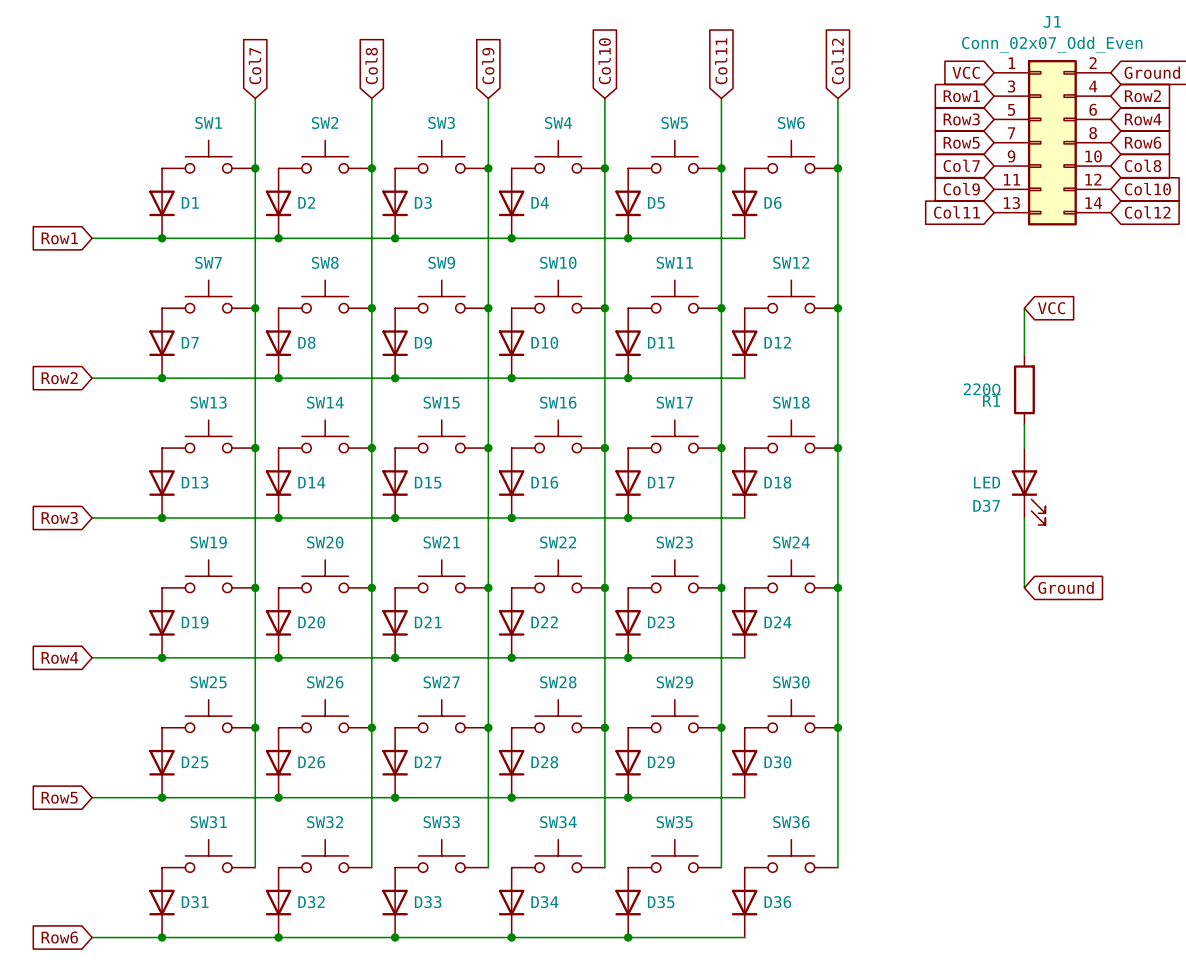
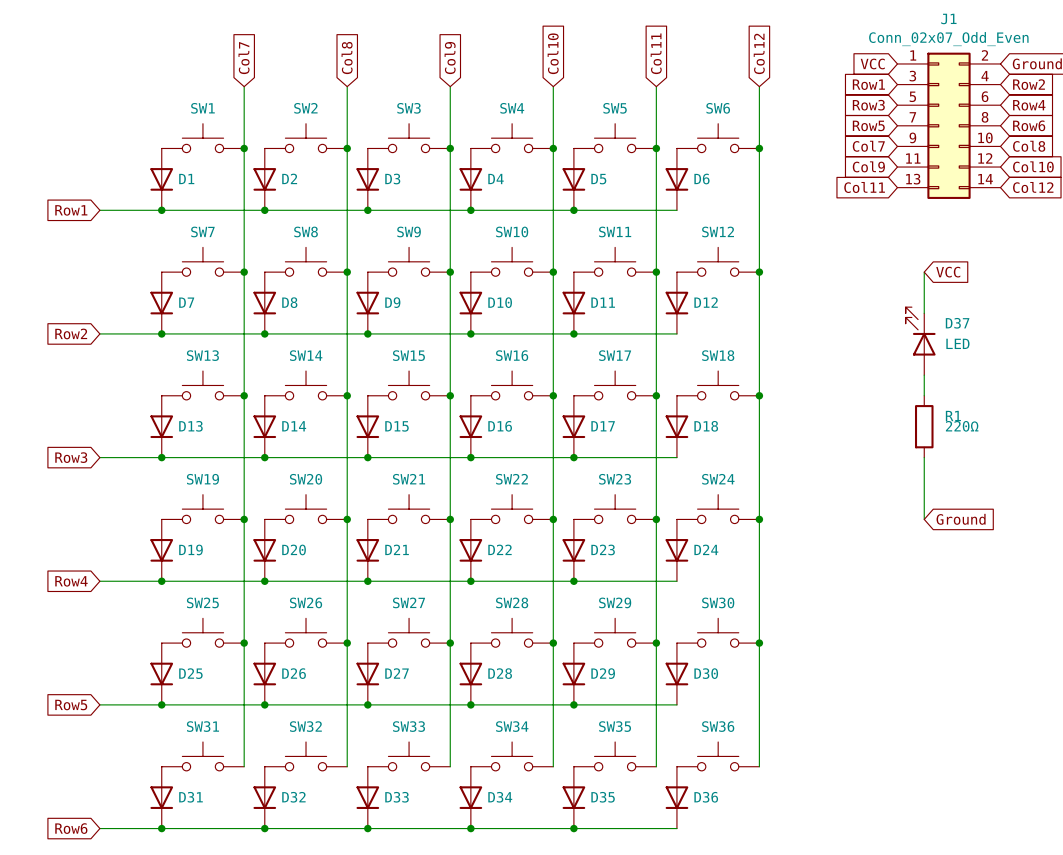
R1 value position: 220Ω (982, 389) -> 220Ω (962, 426)
R1 position: (1024, 389) -> (924, 426)
R1 name position: R1 (991, 401) -> R1 (953, 416)
D37 position: (1028, 486) -> (920, 341)
D37 rotation: 0° (1028, 497) -> 180° (920, 331)

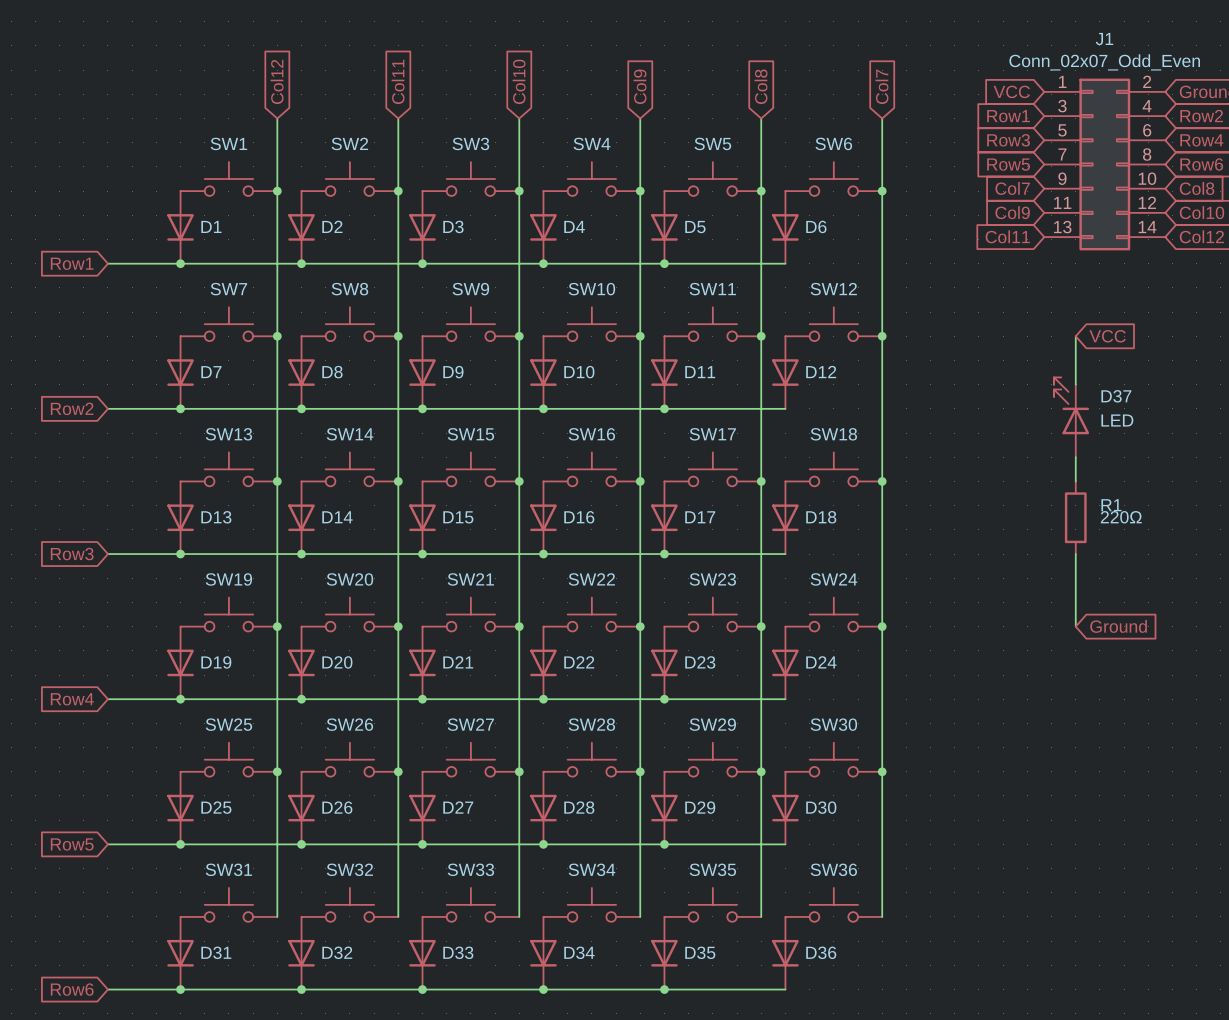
global label: Col10 (553, 53) -> Col9 (640, 86)
global label: Col11 (656, 53) -> Col8 (761, 86)
global label: Col12 (759, 53) -> Col7 (881, 86)
global label: Col7 (244, 58) -> Col12 (277, 81)
global label: Col8 (347, 58) -> Col11 (398, 81)
global label: Col9 (450, 58) -> Col10 (519, 81)

